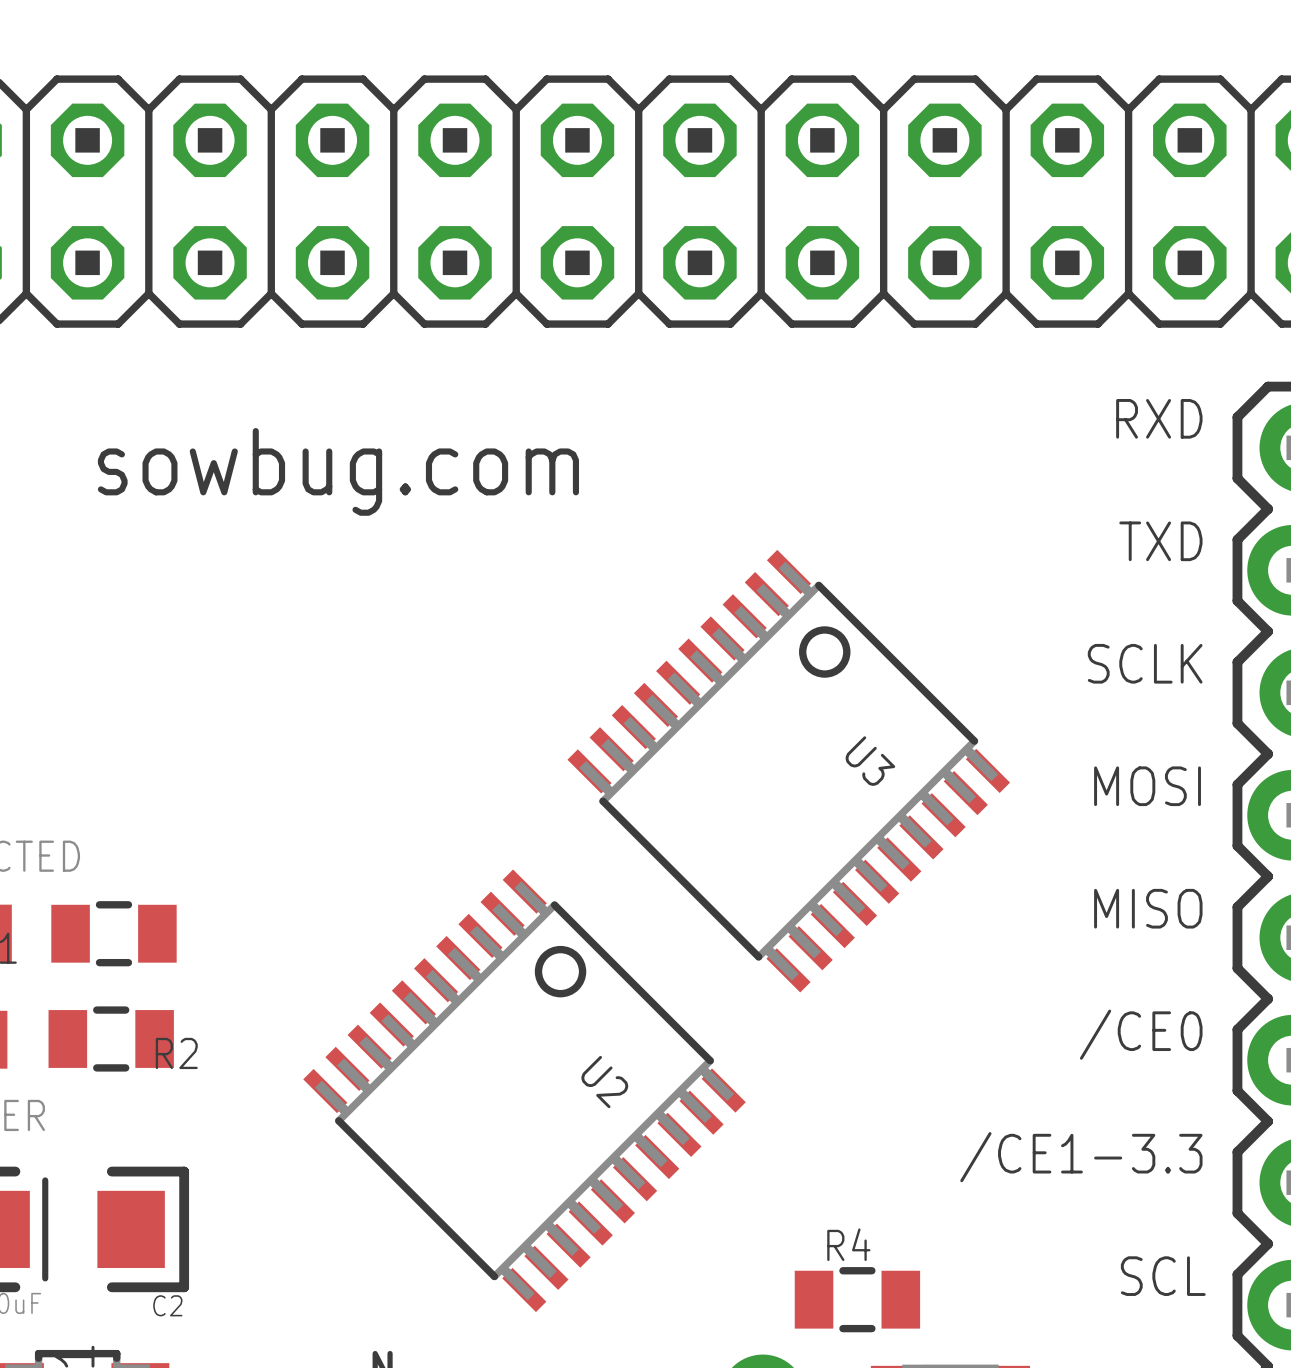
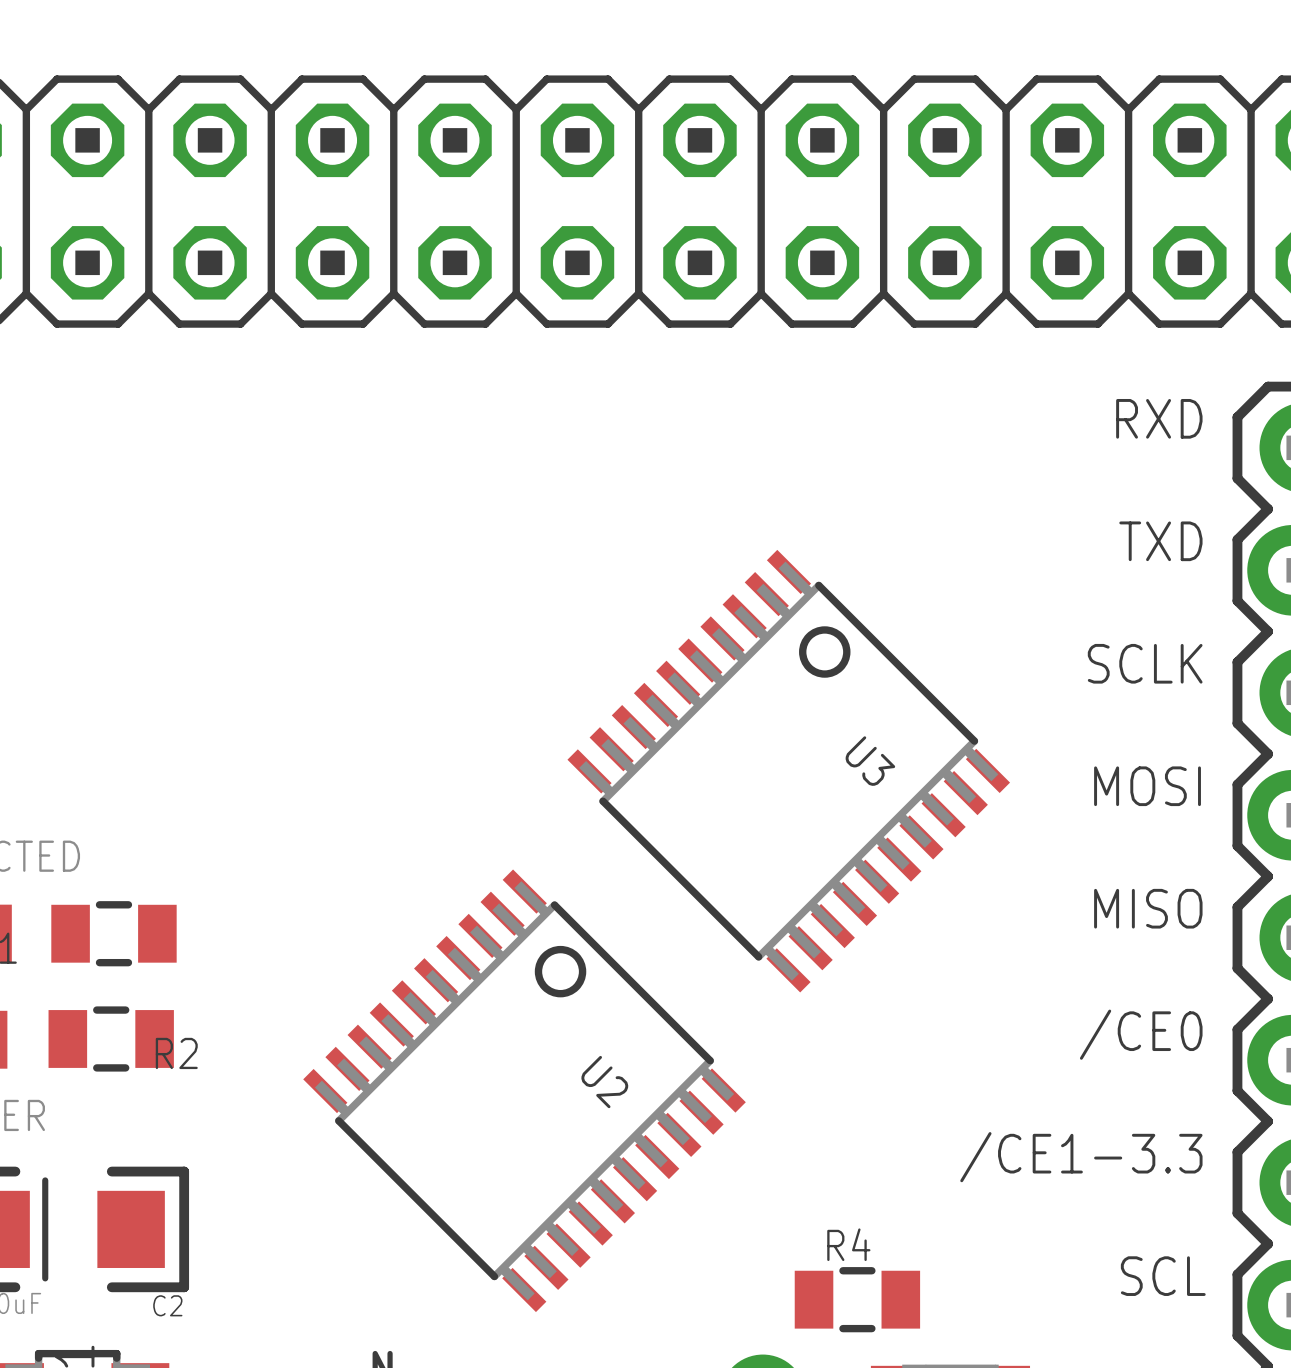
text: sowbug.com (338, 471) -> none

